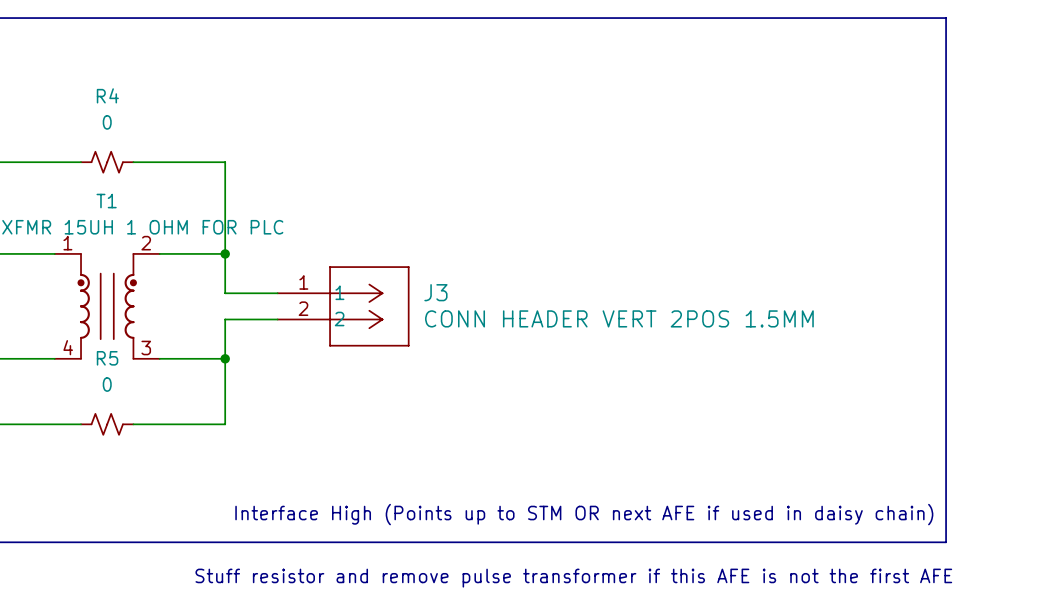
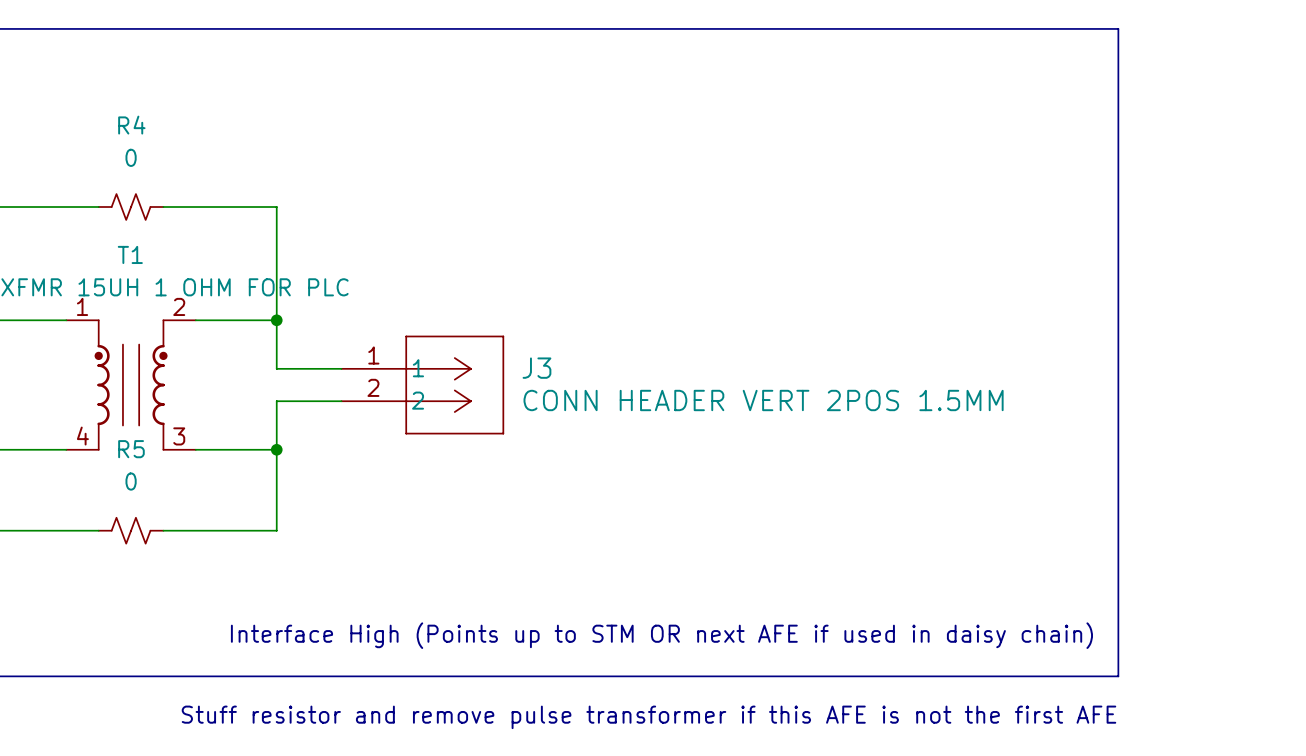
line: (906, 18) (946, 18) (946, 542) (906, 542) -> (1118, 28) (1118, 676)
text position: Interface High (Points up to STM OR next AFE if used in daisy chain) (584, 514) -> Interface High (Points up to STM OR next AFE if used in daisy chain) (661, 635)
text position: Stuff resistor and remove pulse transformer if this AFE is not the first AFE (573, 578) -> Stuff resistor and remove pulse transformer if this AFE is not the first AFE (648, 717)

